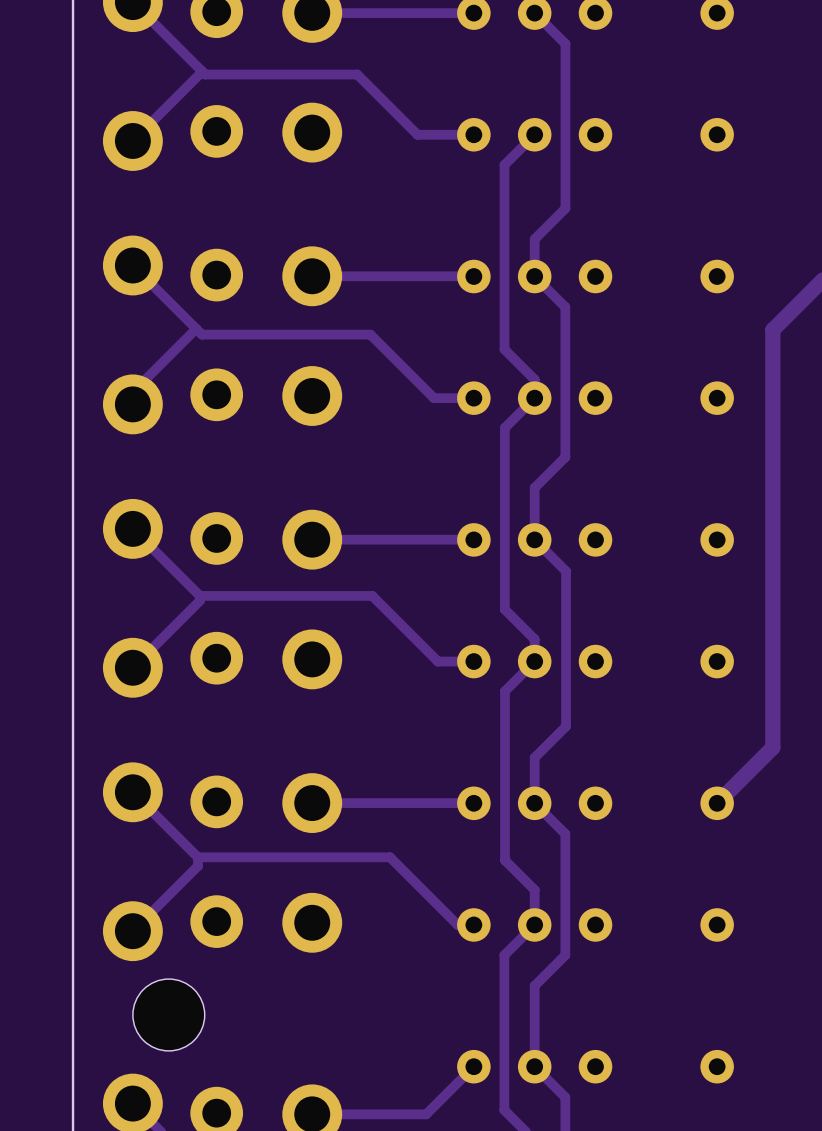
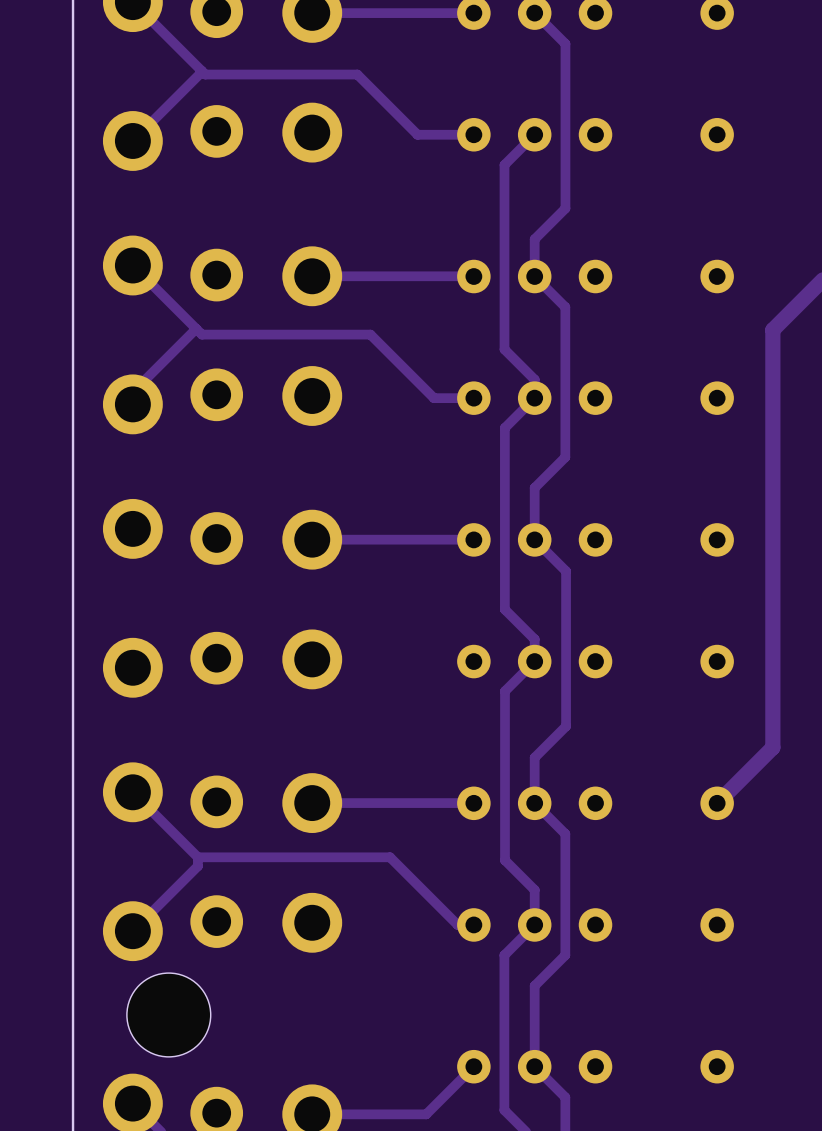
track: (132, 528) (199, 595) -> none
track: (199, 595) (199, 600) (132, 667) -> none
track: (199, 595) (372, 595) (437, 661) (473, 661) -> none
part footprint: [132, 979, 205, 1051] -> [126, 973, 211, 1057]

